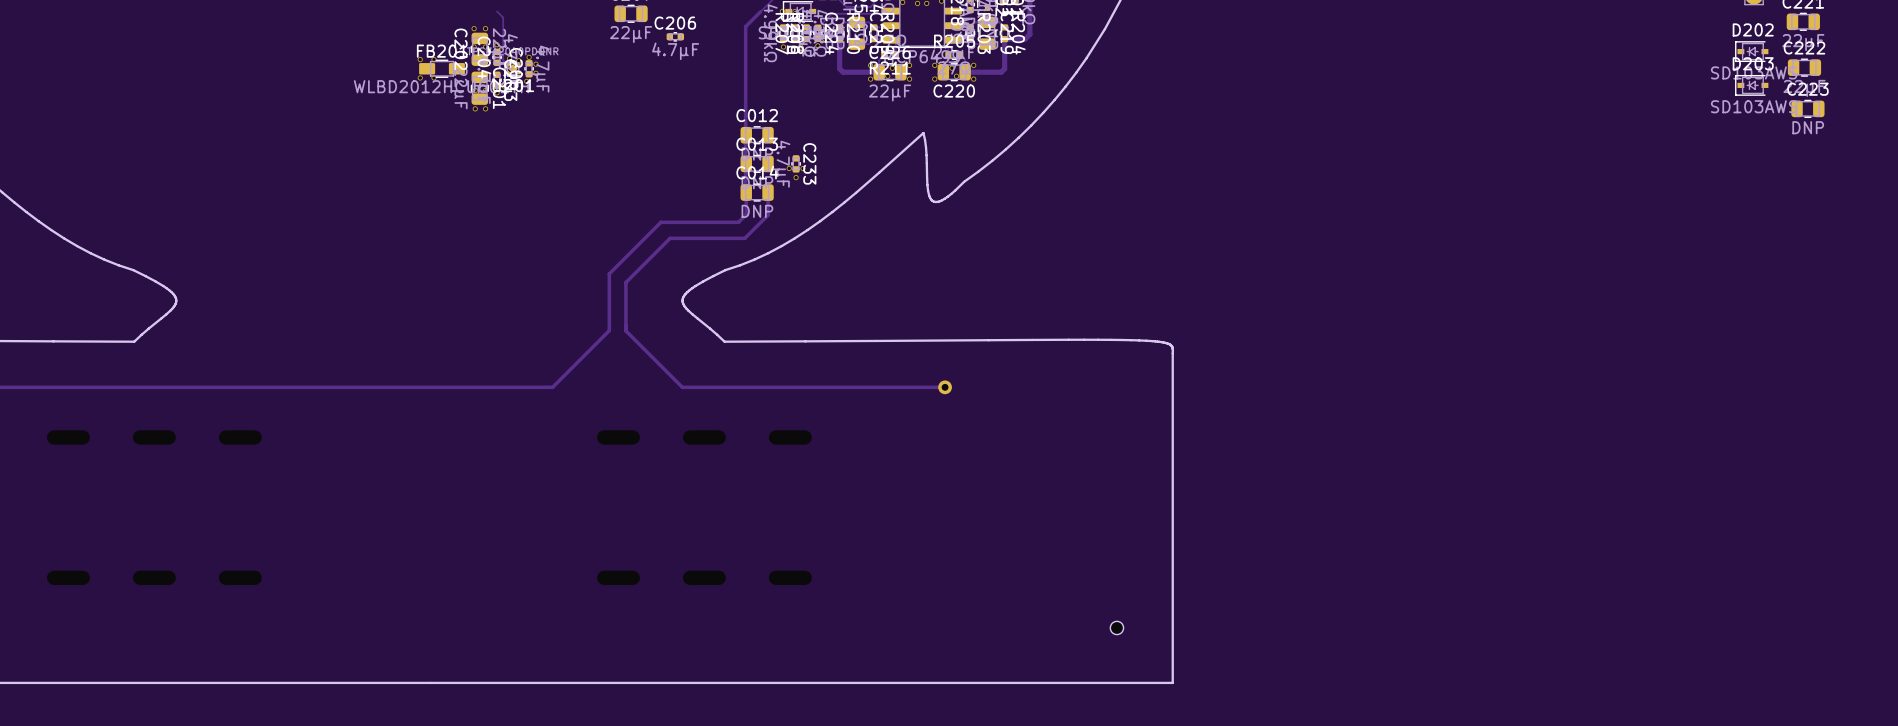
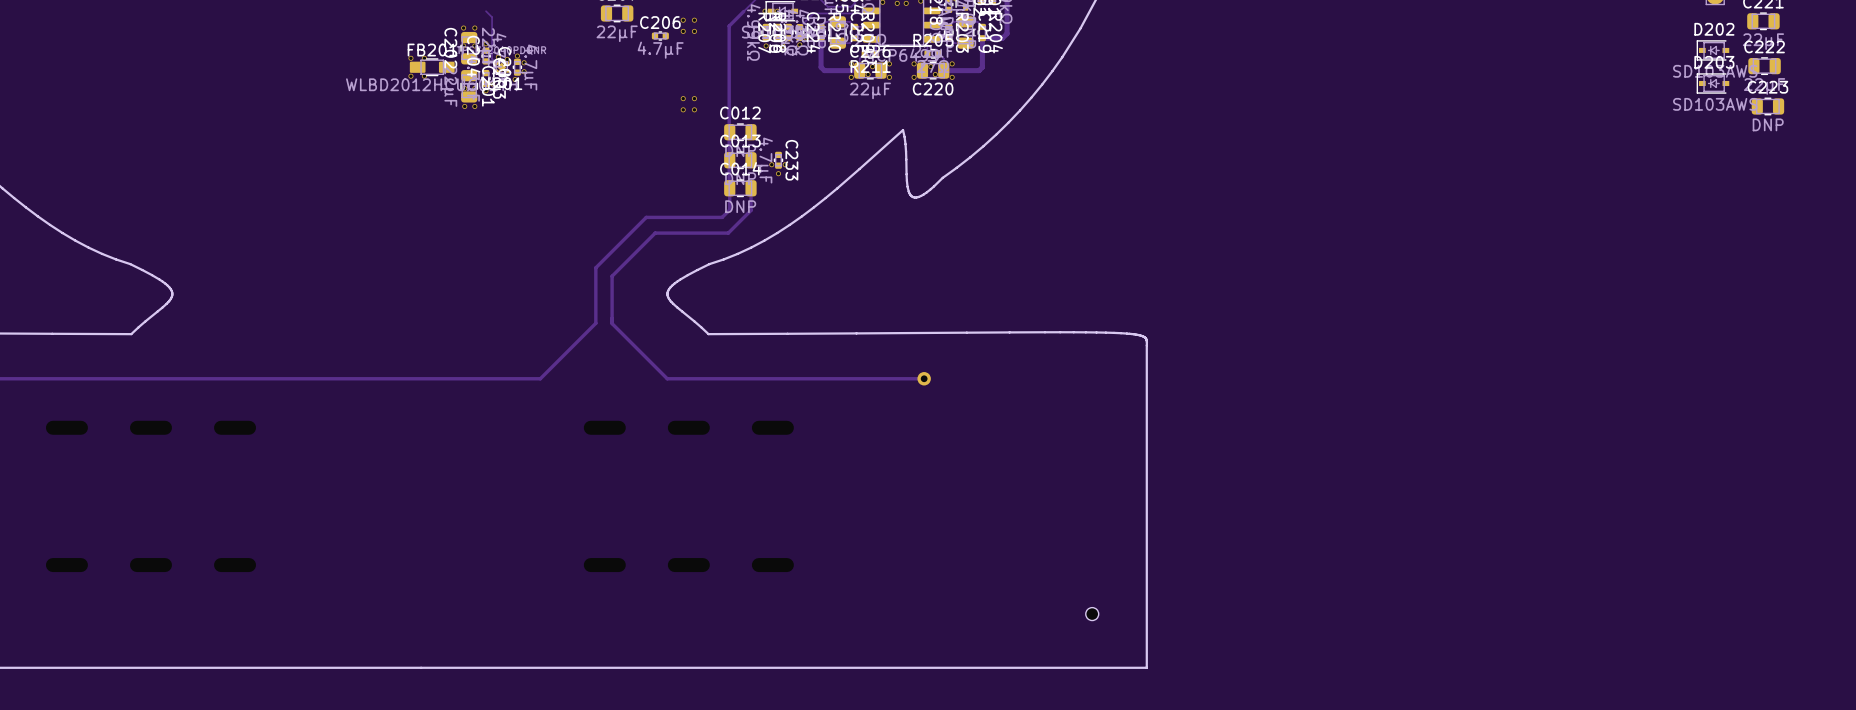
via: none -> (683, 20)
via: none -> (694, 20)
via: none -> (683, 31)
via: none -> (694, 31)
via: none -> (683, 98)
via: none -> (694, 98)
via: none -> (683, 109)
via: none -> (694, 109)

